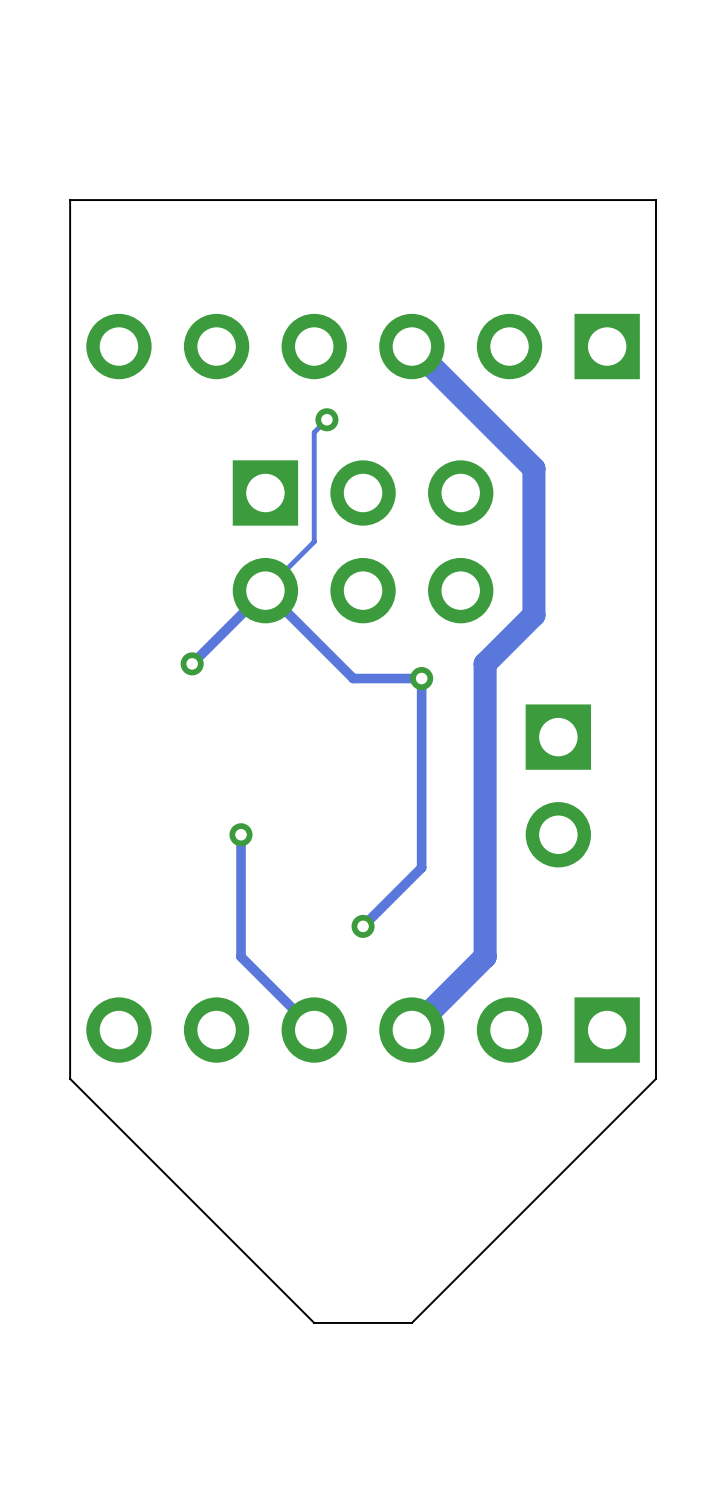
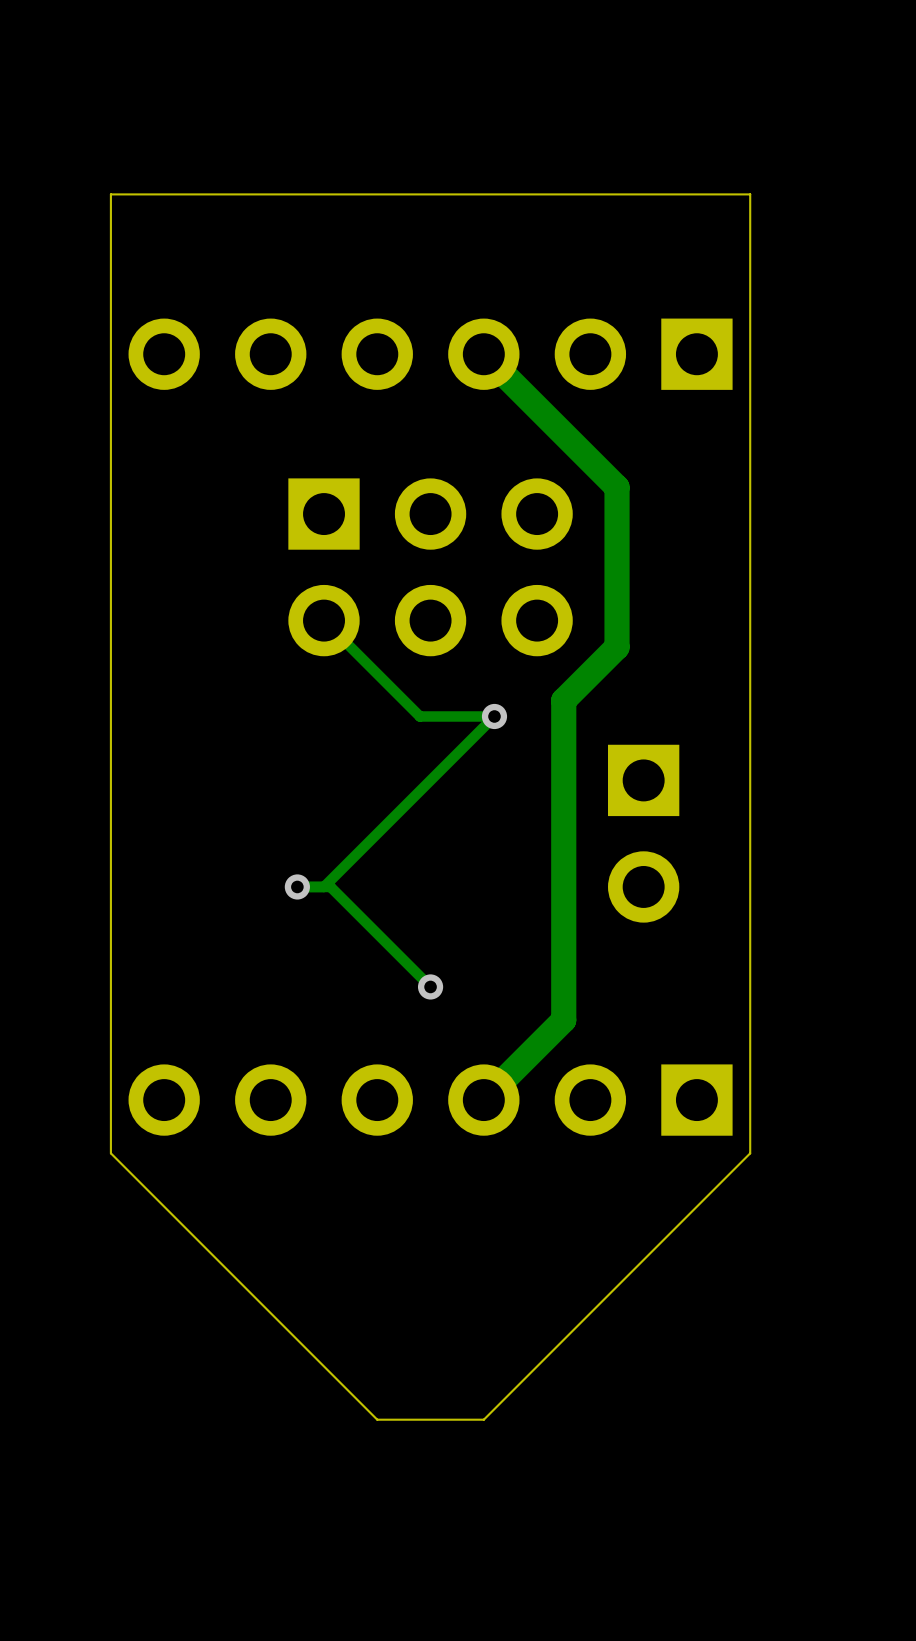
track: (326, 419) (314, 432) (314, 541) (192, 663) -> none
via: (326, 419) -> none
via: (192, 663) -> none
track: (421, 678) (421, 867) (363, 926) -> (494, 716) (324, 886)
track: (241, 834) (241, 956) (314, 1030) -> (297, 886) (330, 886) (430, 986)

